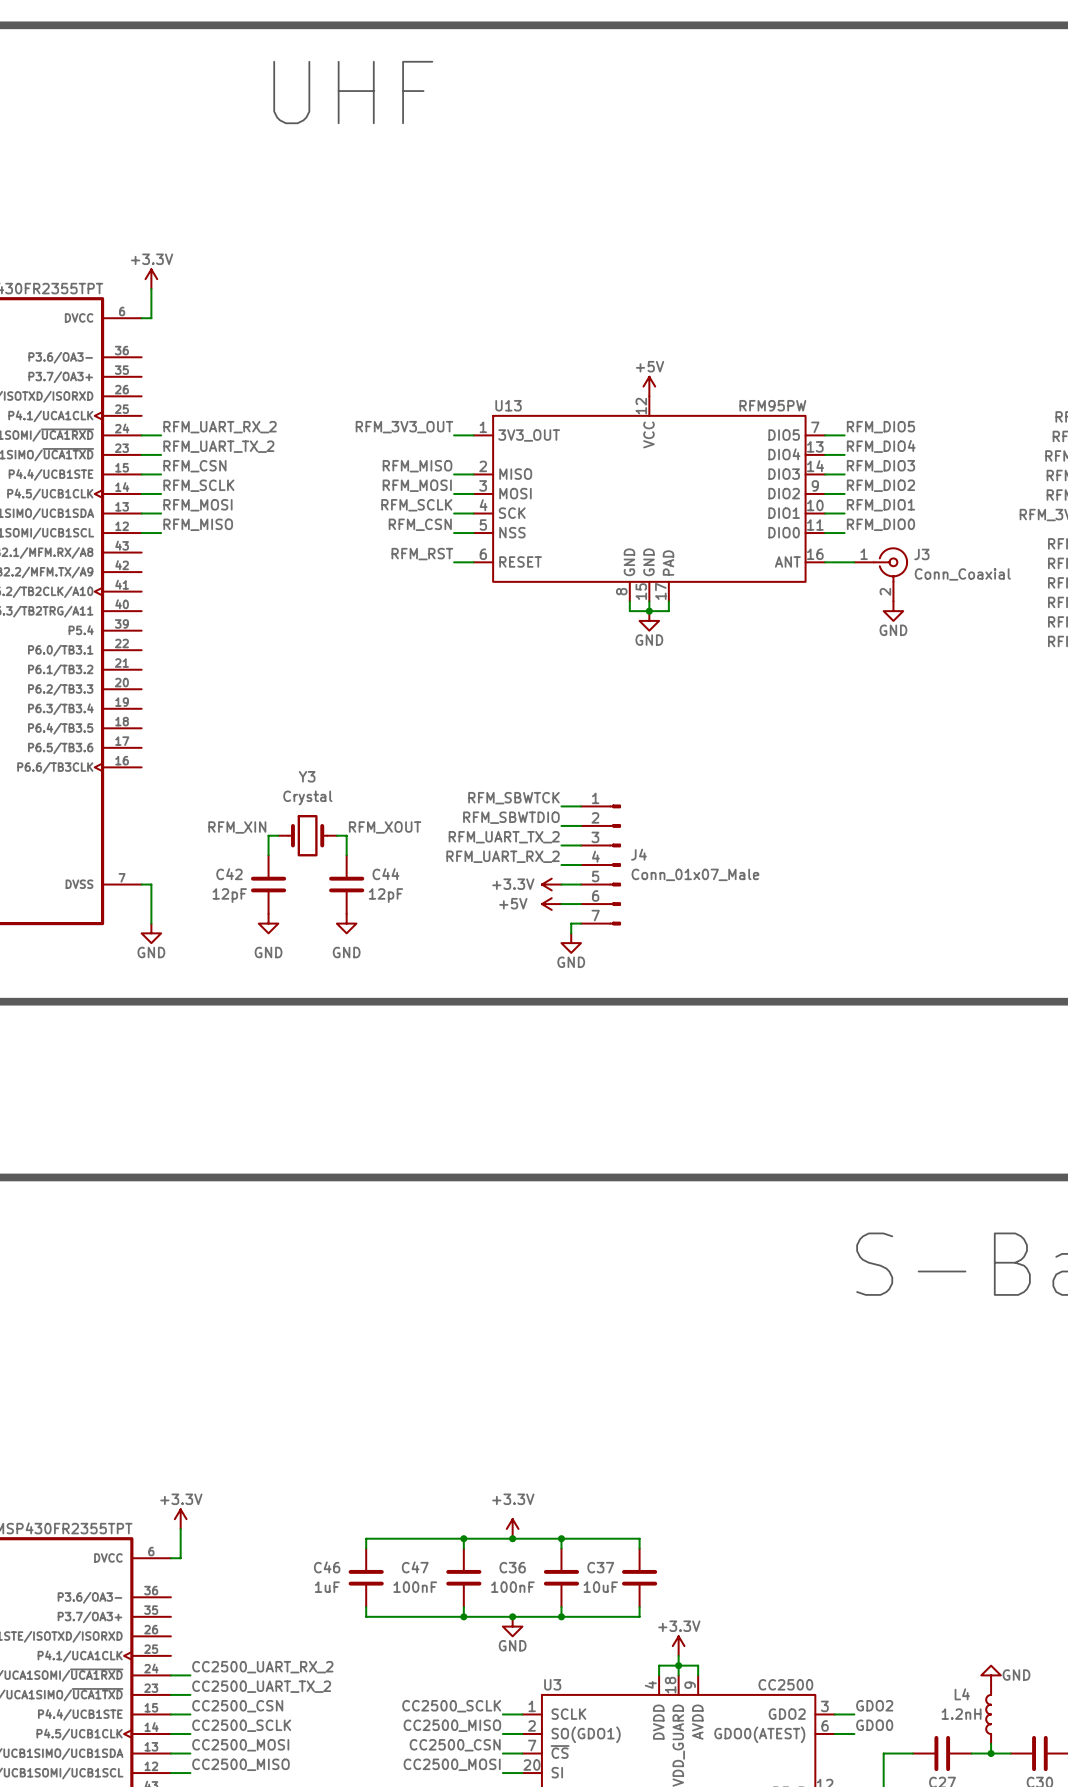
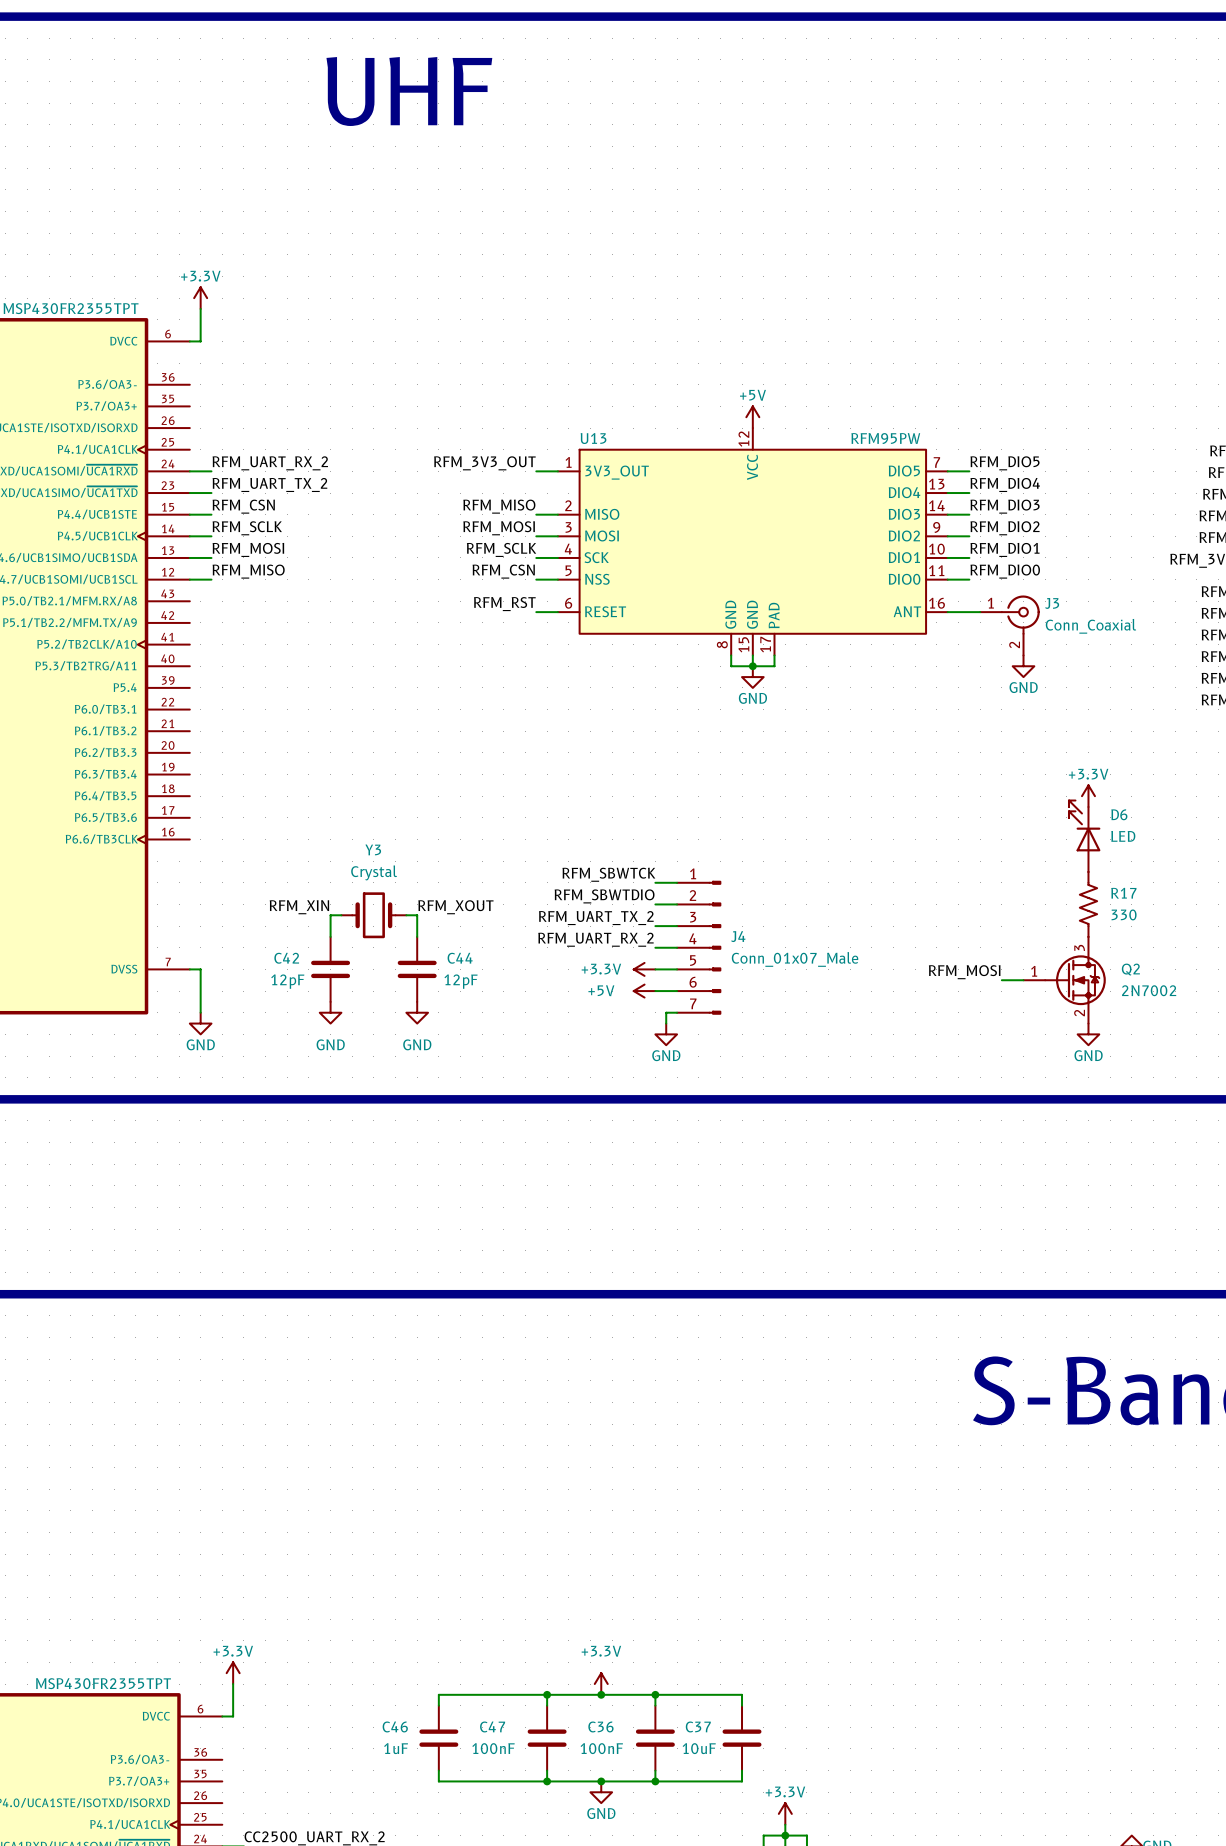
power symbol: none -> +3.3V (1088, 796)
D6: none -> LED (1084, 836)
R17: none -> 330 (1088, 904)
label: none -> RFM_MOSI (964, 972)
wire: none -> (1001, 980) (1023, 980)
Q2: none -> 2N7002 (1064, 980)
power symbol: none -> GND (1088, 1034)

